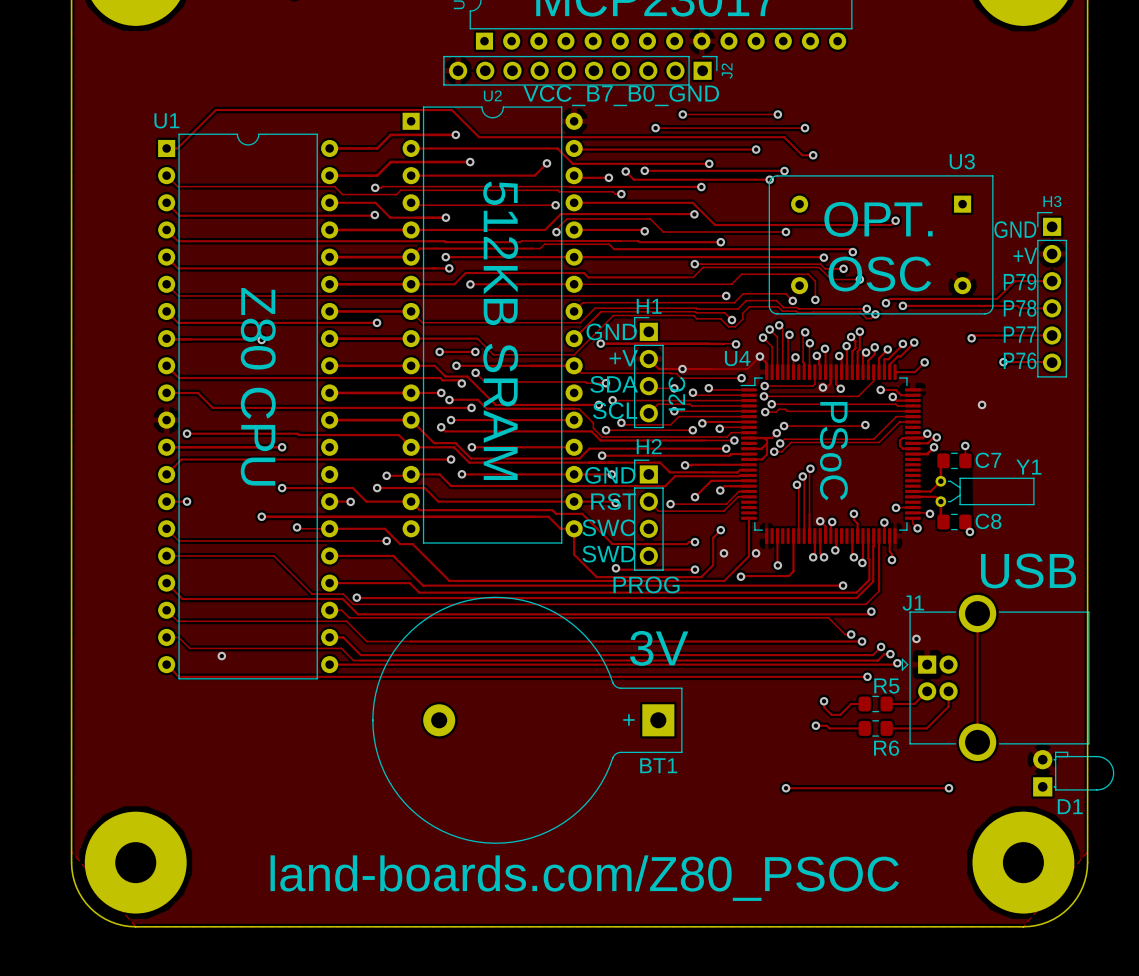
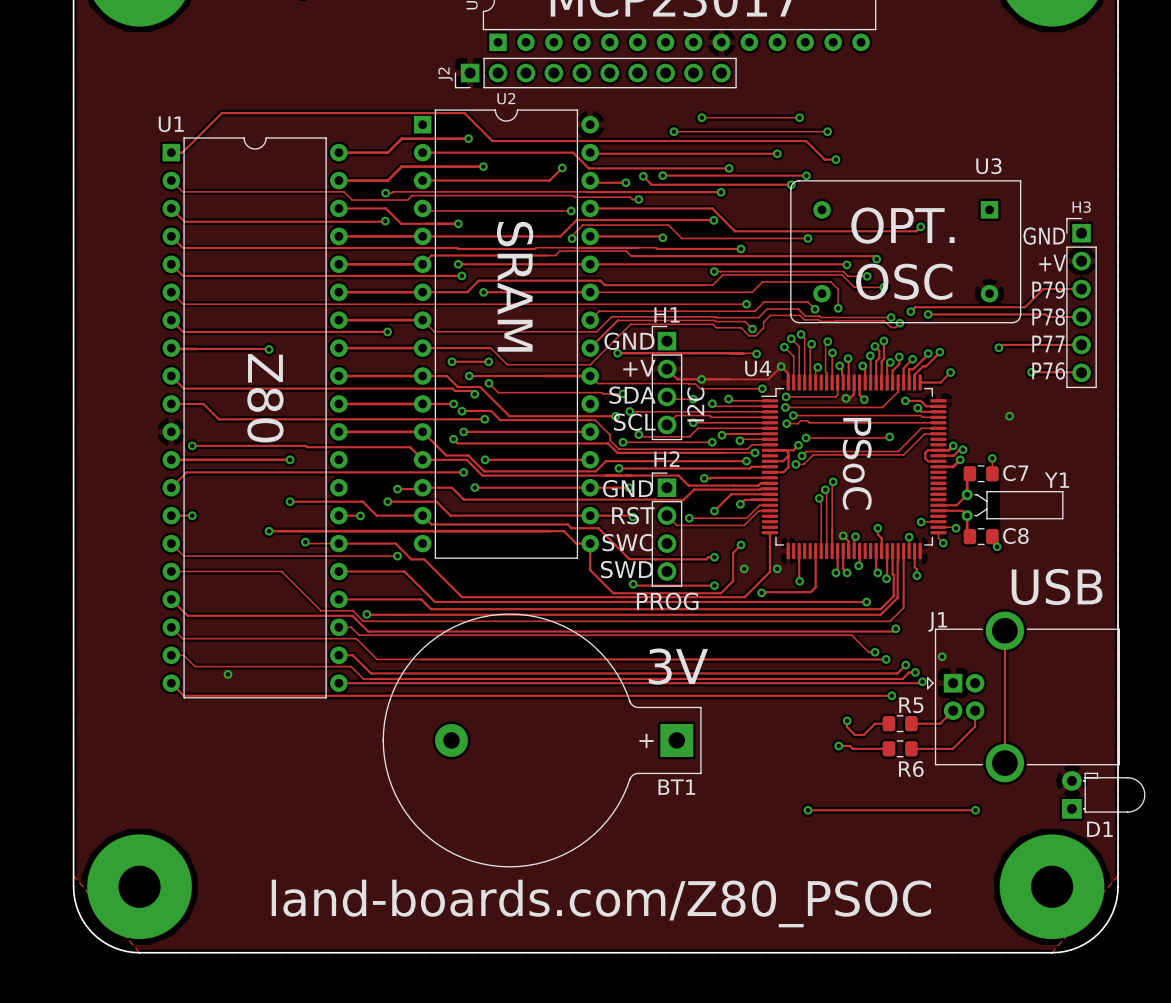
J2 rotation: 0° (580, 70) -> 180° (595, 73)
text: VCC_B7_B0_GND (621, 95) -> none
text: none -> SRAM (515, 286)
text: 512KB SRAM (500, 330) -> none
text: Z80 CPU (258, 386) -> Z80 (265, 398)

